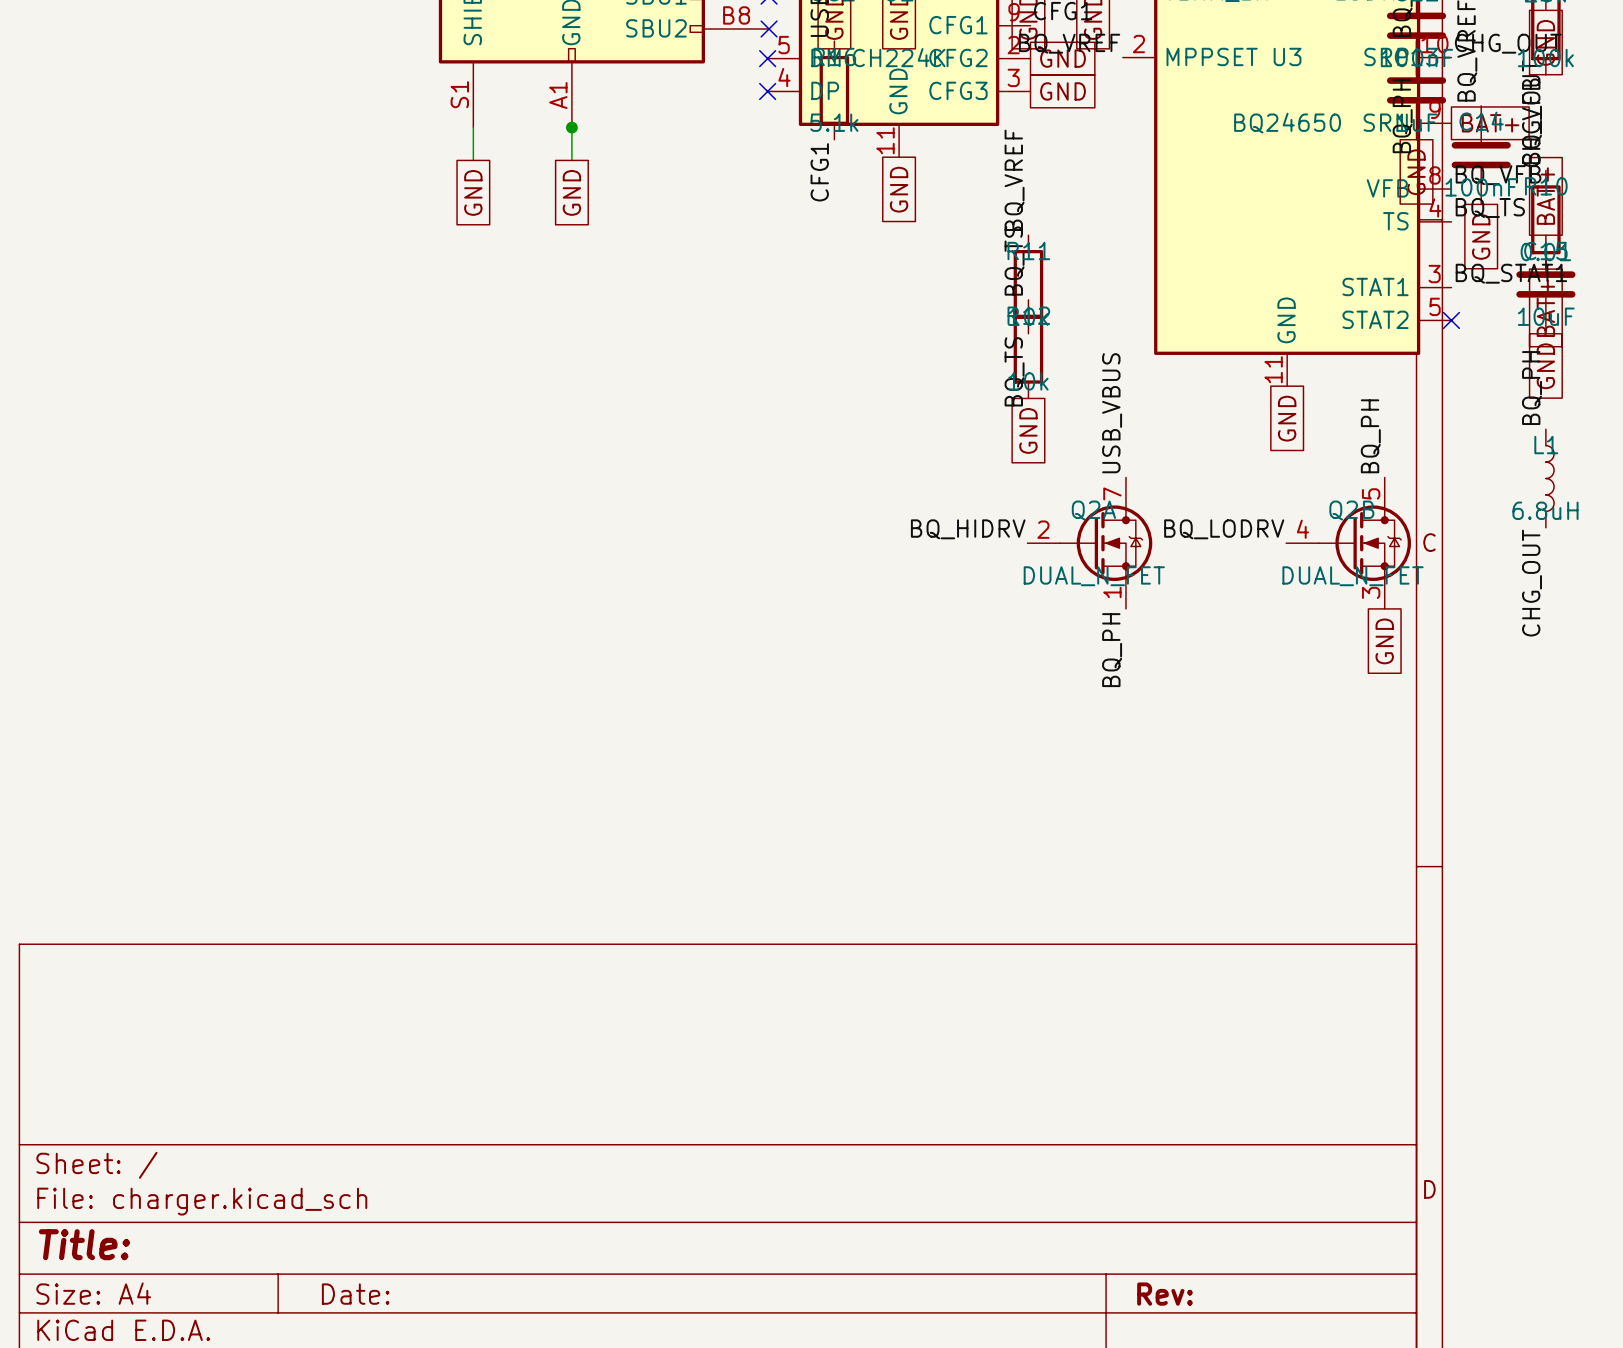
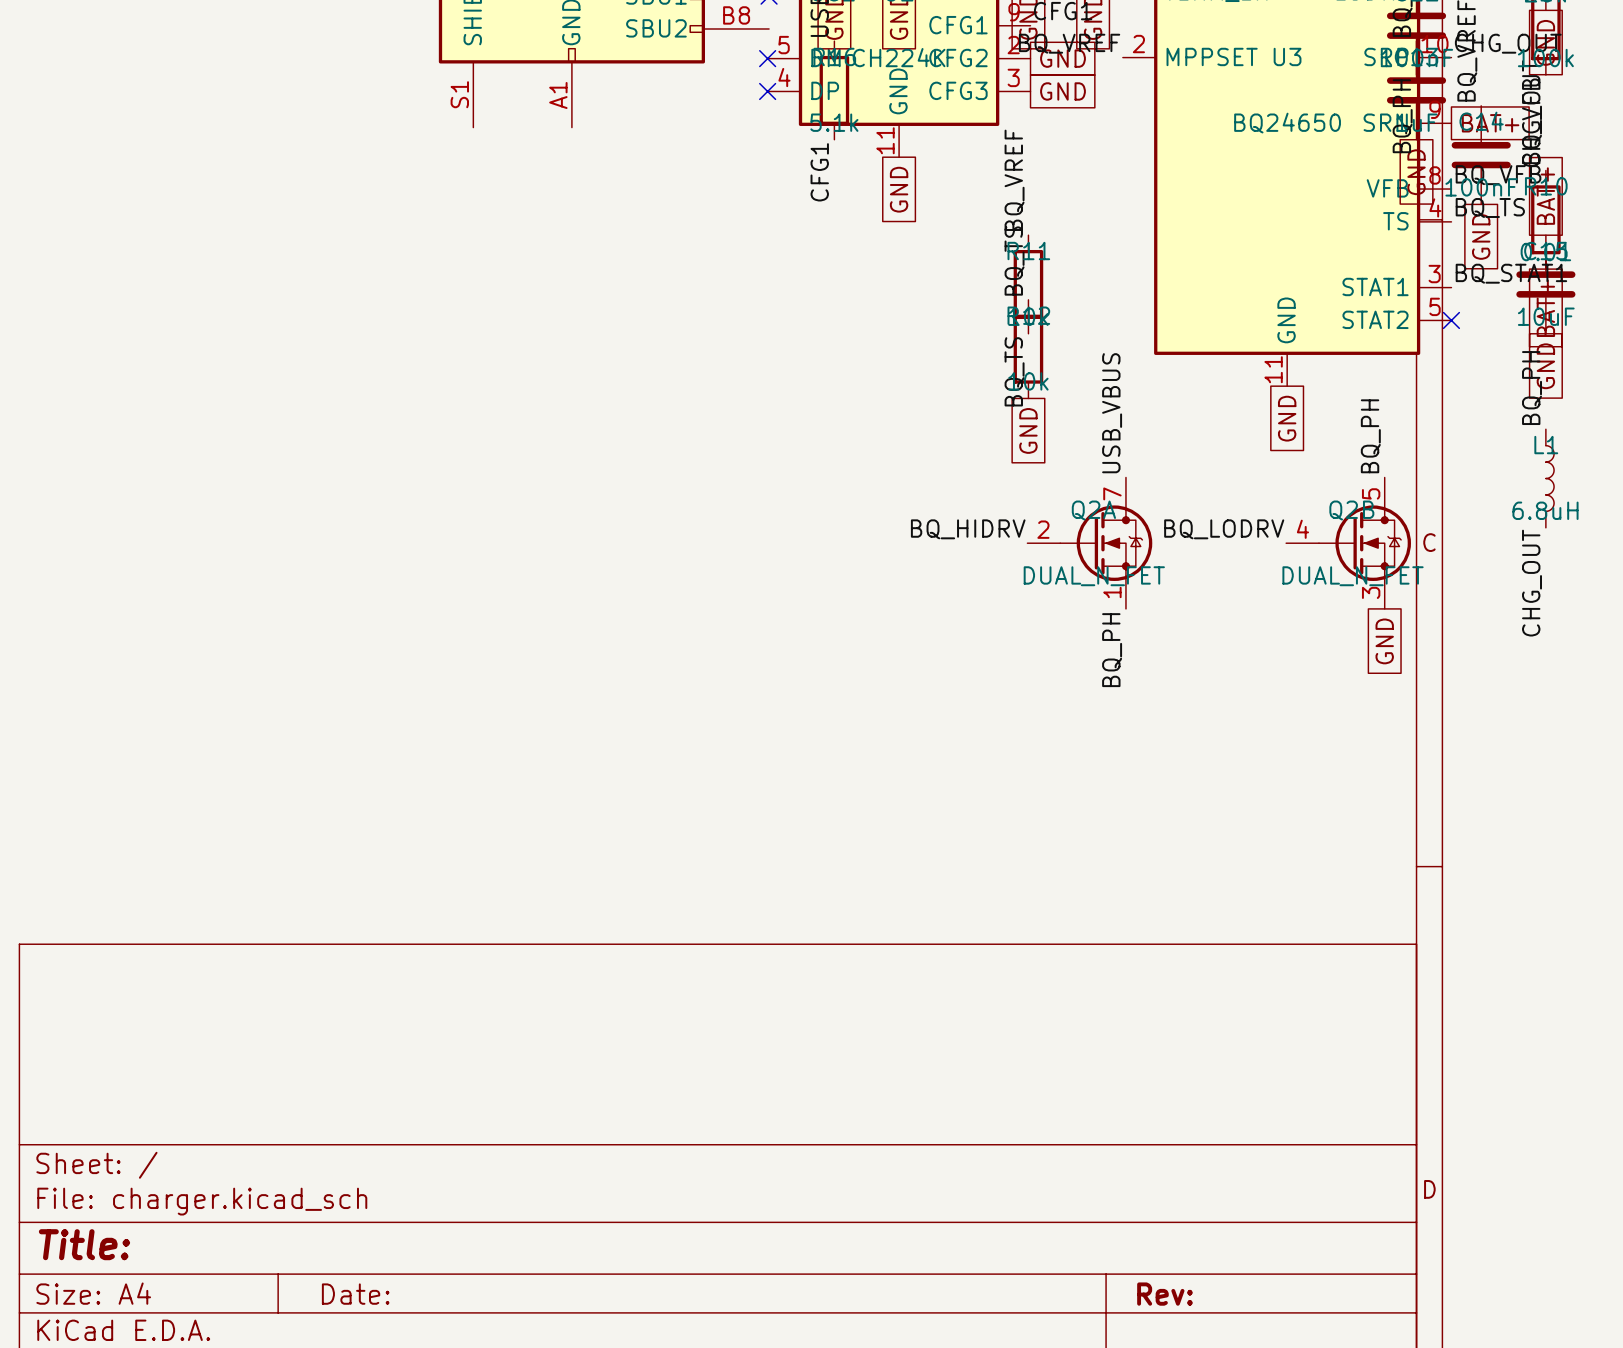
no-connect mark: (769, 28) -> none
wire: (473, 127) (473, 160) -> none
wire: (571, 127) (571, 160) -> none
junction: (571, 127) -> none
global label: GND (473, 192) -> none
global label: GND (571, 192) -> none

